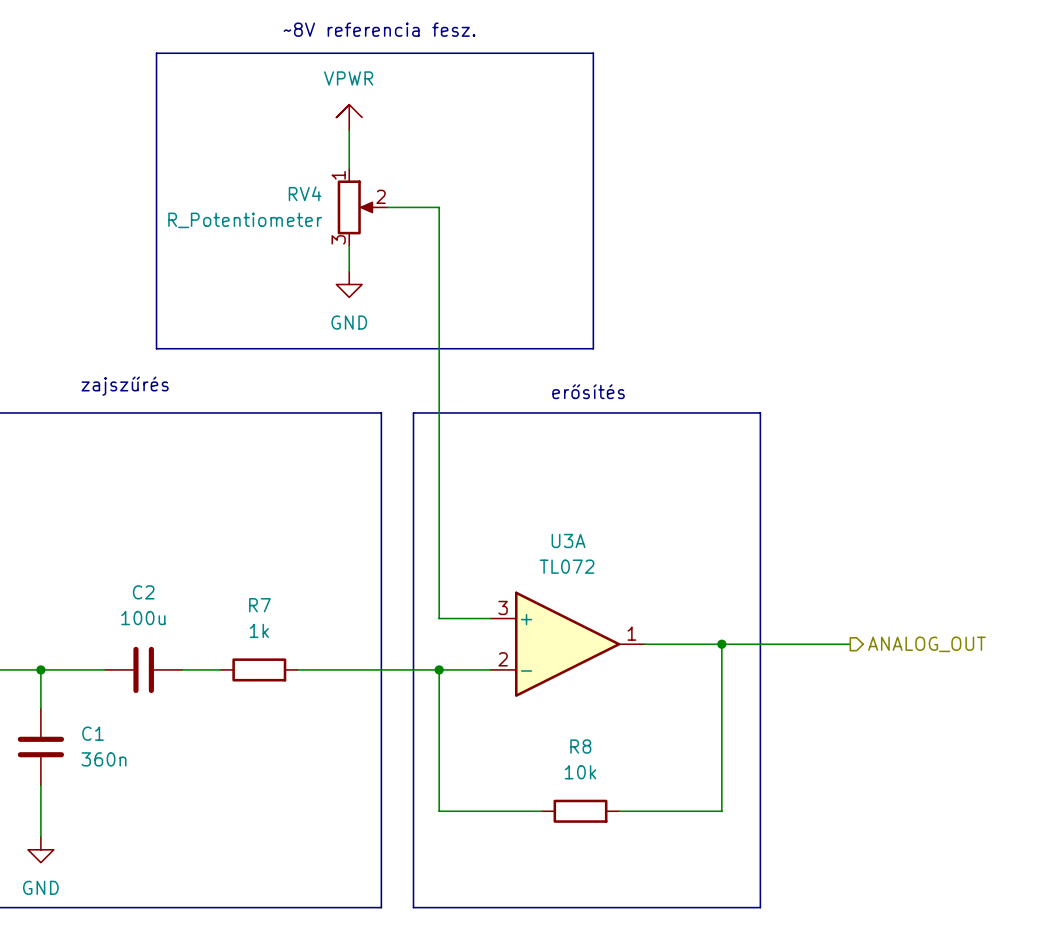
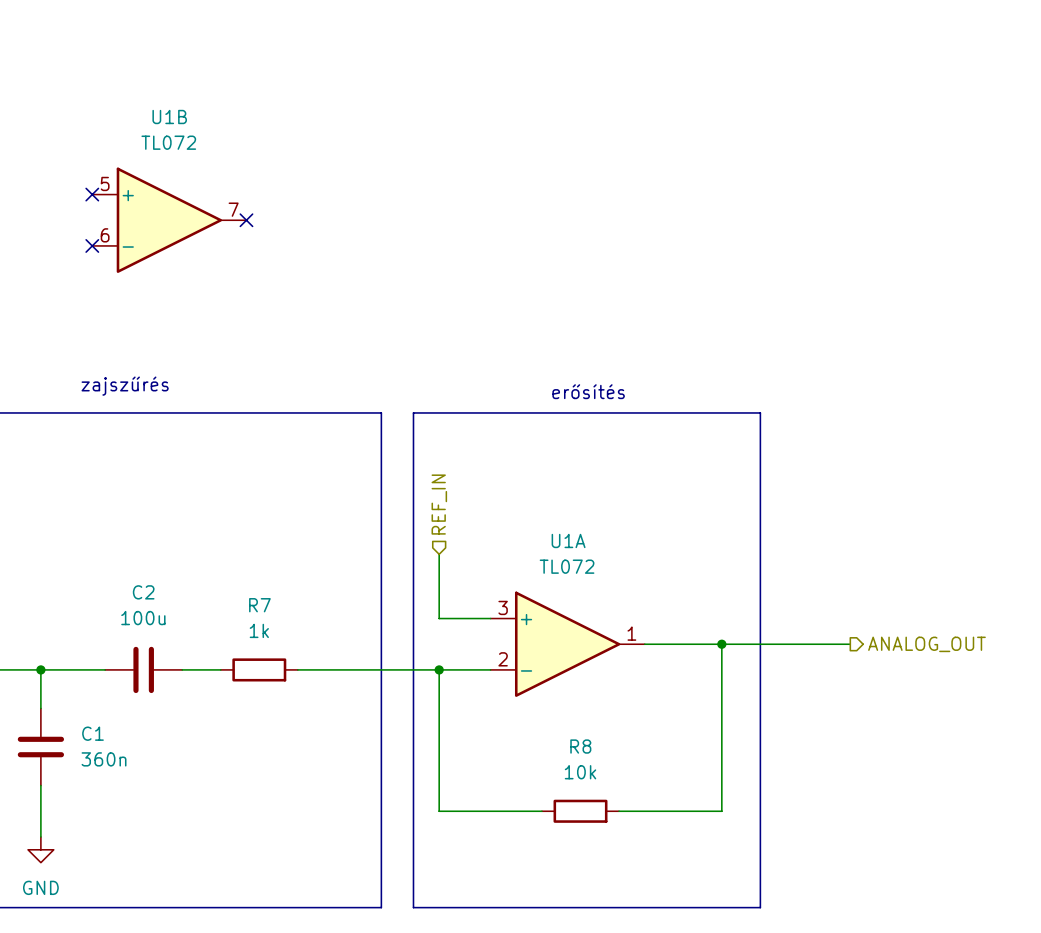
text: ~8V referencia fesz. (379, 29) -> none
line: (156, 53) (593, 53) (593, 348) (156, 348) (156, 53) -> none
power symbol: VPWR (349, 117) -> none
wire: (349, 130) (349, 168) -> none
no-connect mark: none -> (92, 194)
RV4: R_Potentiometer (362, 207) -> none
wire: (387, 207) (439, 207) (439, 554) -> none
U1B: none -> TL072 (169, 220)
no-connect mark: none -> (246, 220)
no-connect mark: none -> (92, 245)
wire: (349, 245) (349, 271) -> none
power symbol: GND (349, 284) -> none
hierarchical label: none -> REF_IN (439, 504)
U3A name: U3A (568, 540) -> U1A (568, 540)

